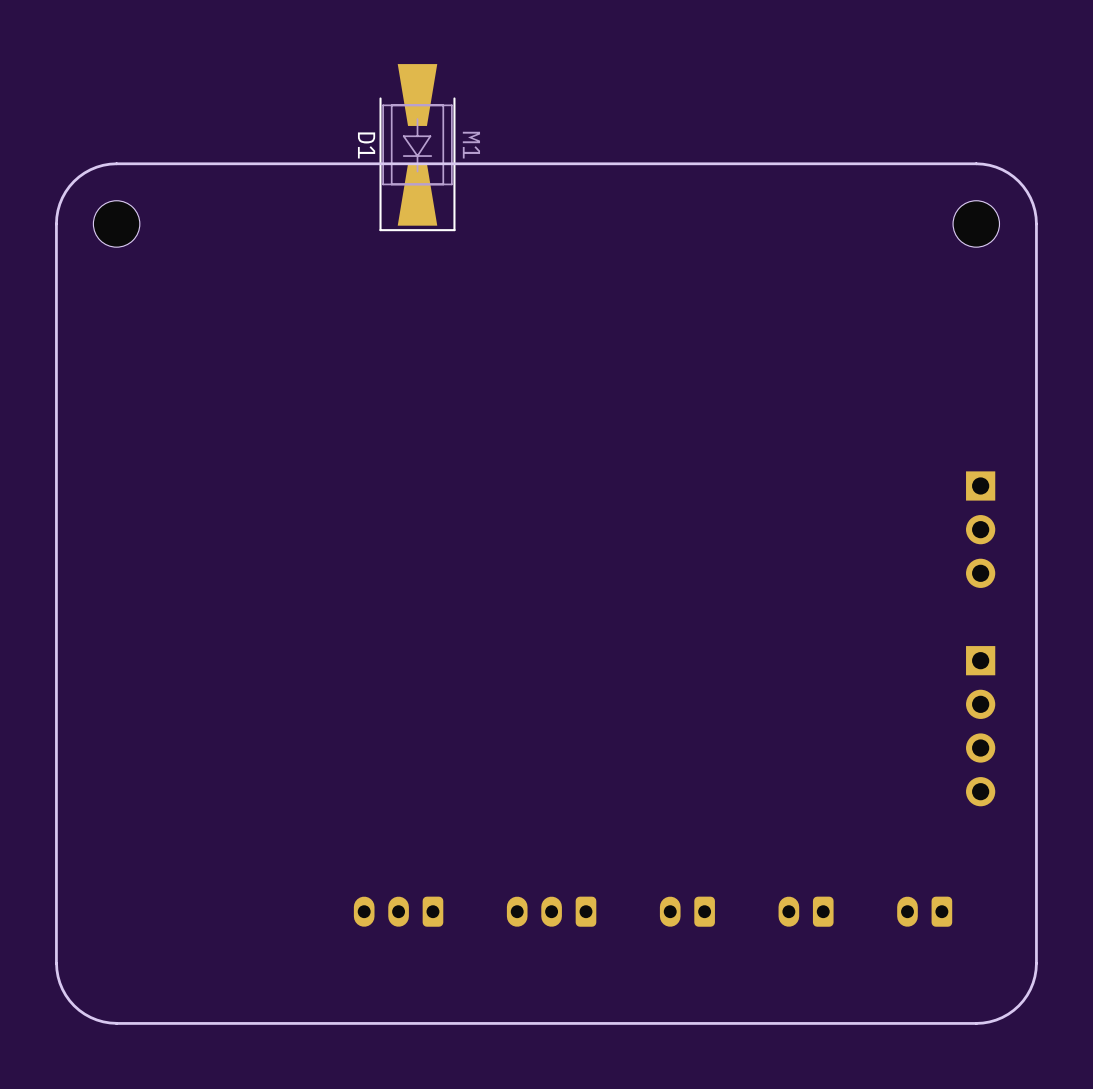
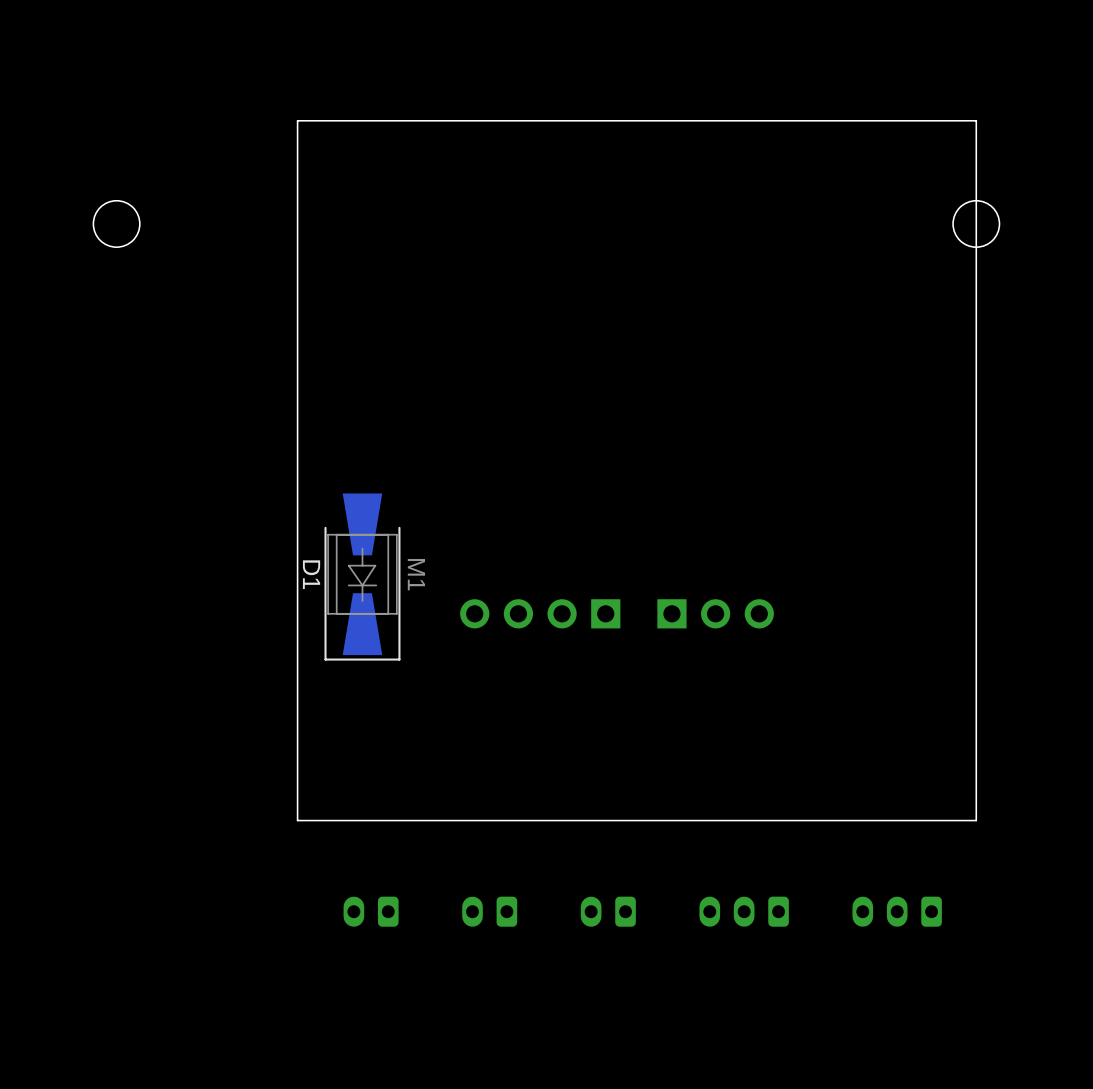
D1 position: (417, 147) -> (362, 577)
board edge: (976, 163) (116, 163) (96, 167) (84, 173) (74, 181) (65, 191) (59, 204) (56, 223) (56, 963) (62, 989) (74, 1005) (90, 1017) (103, 1021) (116, 1023) (976, 1023) (989, 1021) (1002, 1017) (1018, 1005) (1027, 995) (1033, 983) (1036, 963) (1036, 223) (1033, 204) (1027, 191) (1018, 181) (1008, 173) (996, 167) (976, 163) -> (976, 120) (976, 820) (297, 820) (297, 120) (976, 120)
part rotation: 0° (980, 529) -> 90° counterclockwise (715, 613)
part position: (980, 529) -> (715, 613)
part: none -> (540, 613)
part: (980, 726) -> none
part: none -> (371, 911)
part: (398, 911) -> none
part: none -> (489, 911)
part: (551, 911) -> none
part position: (687, 911) -> (608, 911)
part: none -> (744, 911)
part: (806, 911) -> none
part: none -> (897, 911)
part: (924, 911) -> none

